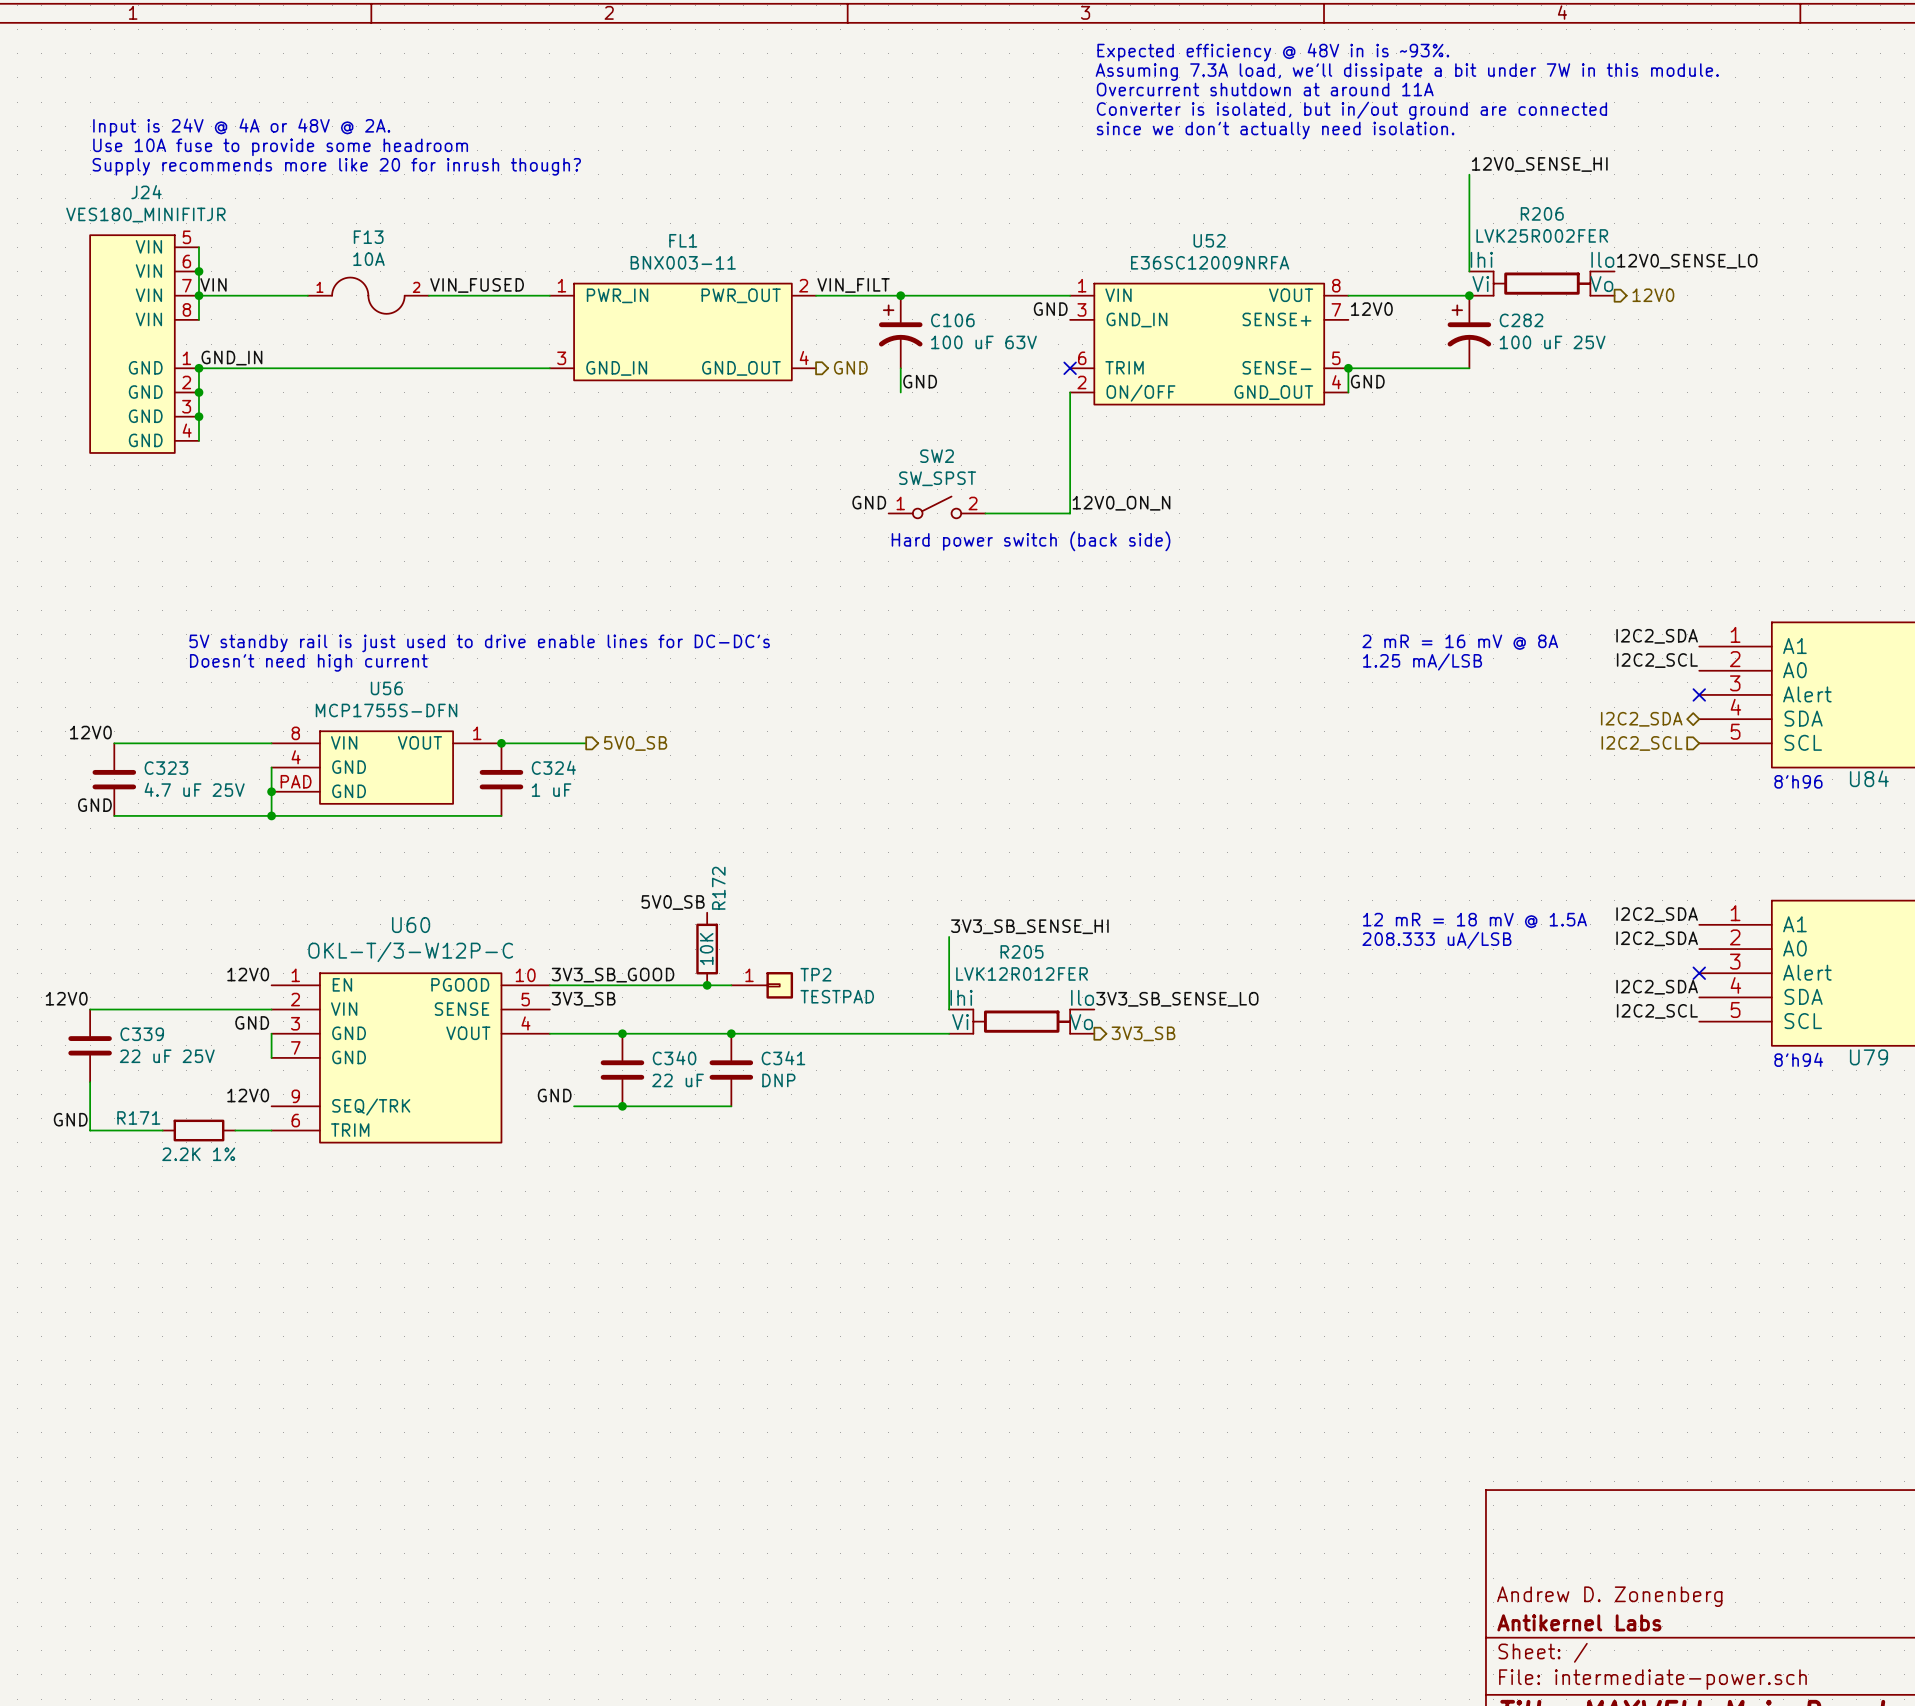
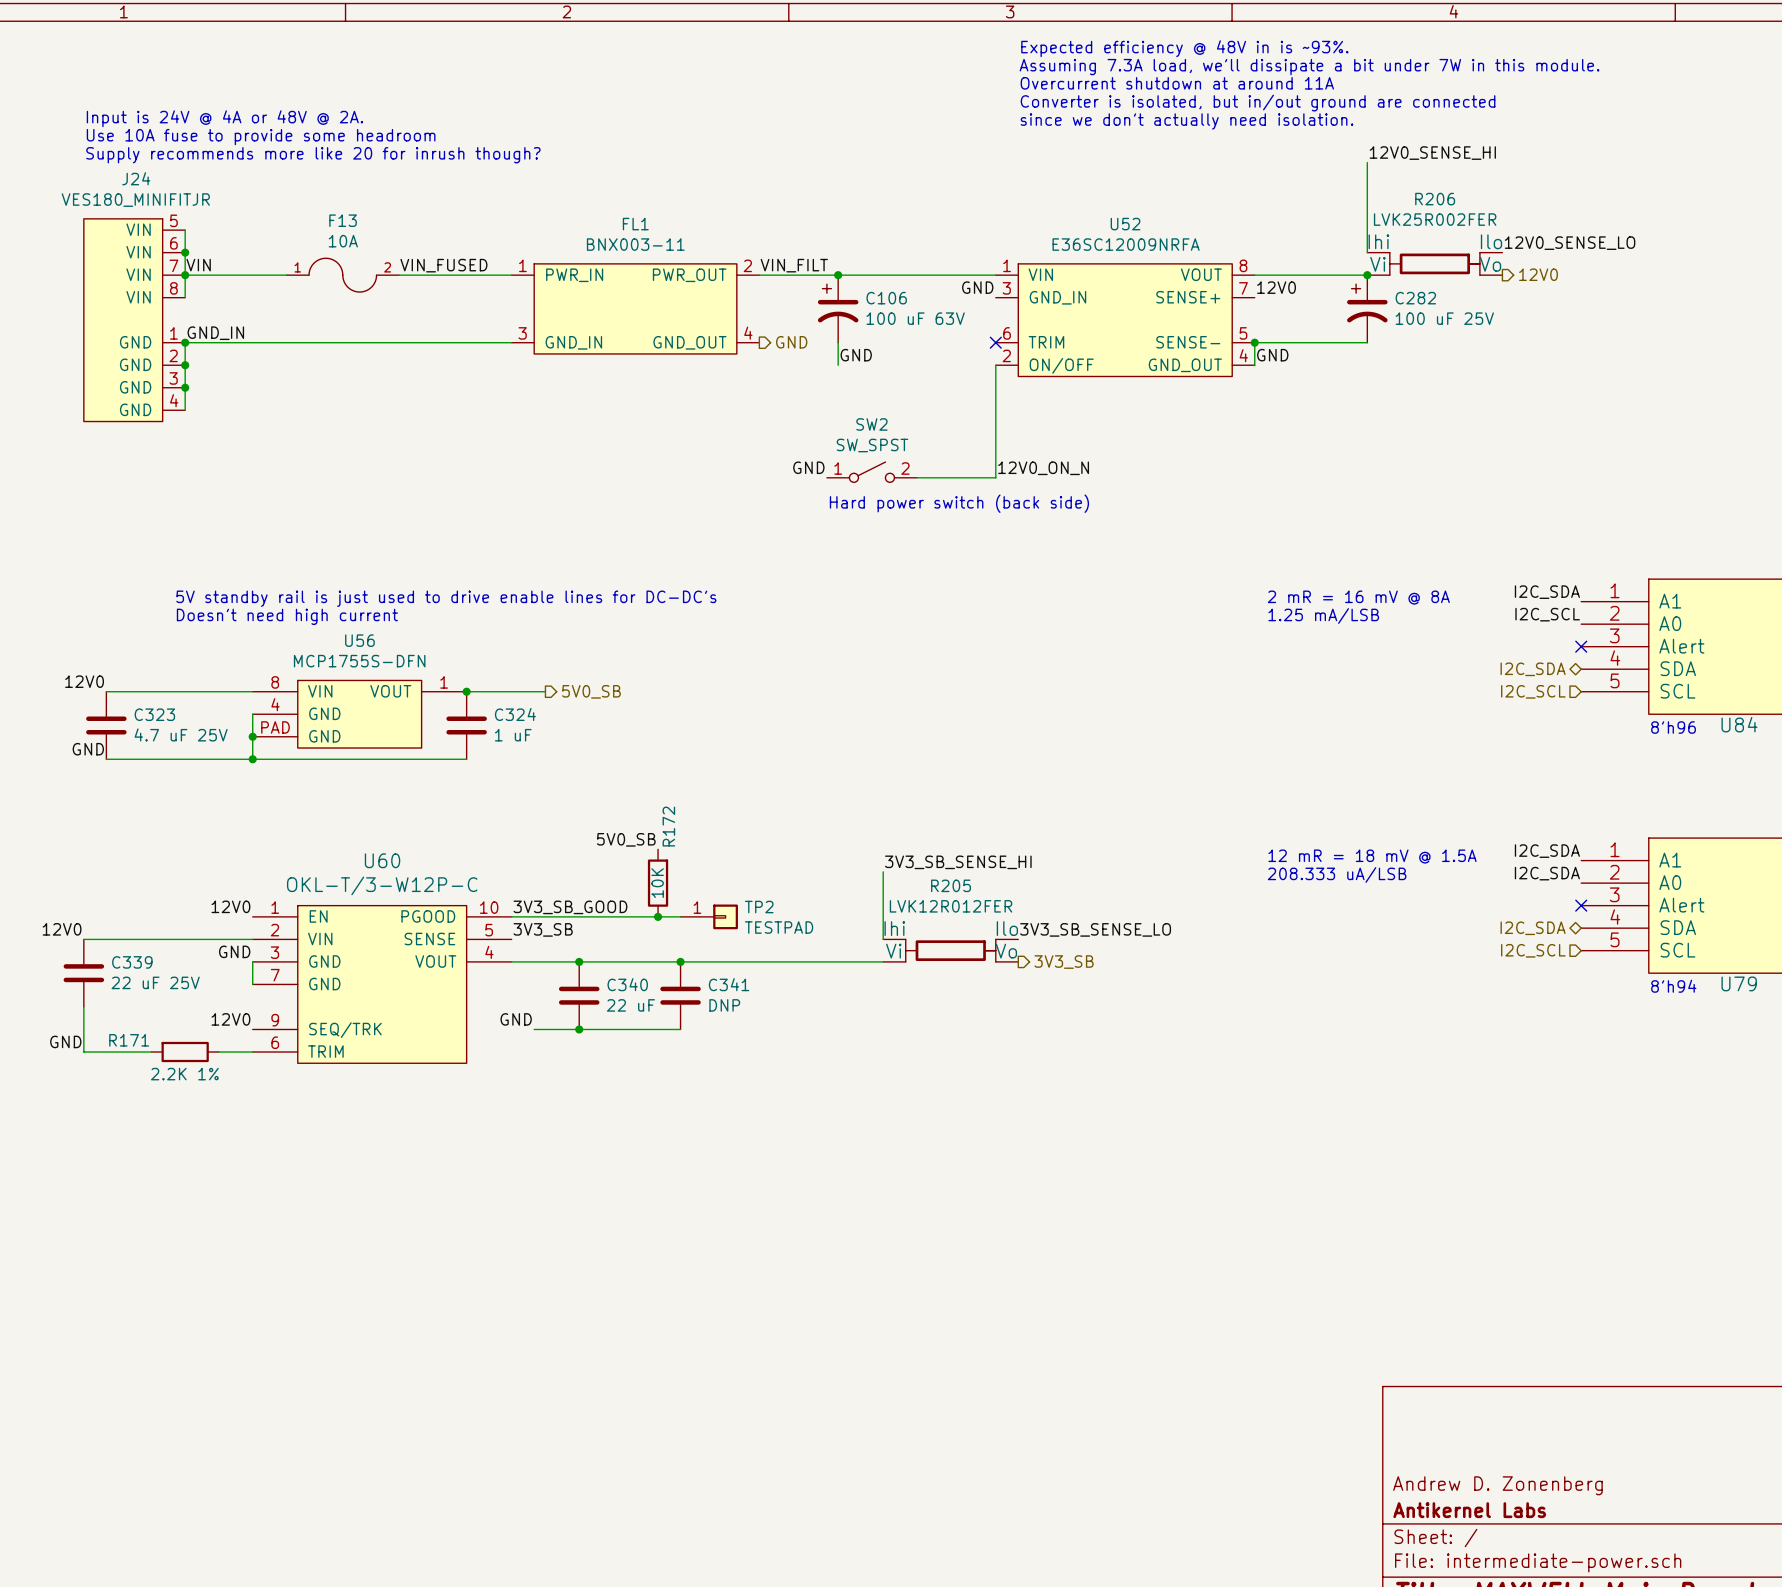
label: I2C2_SDA (1657, 636) -> I2C_SDA (1547, 592)
label: I2C2_SCL (1657, 660) -> I2C_SCL (1547, 614)
hierarchical label: I2C2_SDA (1641, 719) -> I2C_SDA (1533, 669)
hierarchical label: I2C2_SCL (1642, 743) -> I2C_SCL (1533, 691)
label: I2C2_SDA (1657, 914) -> I2C_SDA (1547, 851)
label: I2C2_SDA (1657, 938) -> I2C_SDA (1547, 873)
label: I2C2_SDA (1657, 987) -> none
hierarchical label: none -> I2C_SDA (1533, 928)
label: I2C2_SCL (1657, 1011) -> none
hierarchical label: none -> I2C_SCL (1533, 950)

